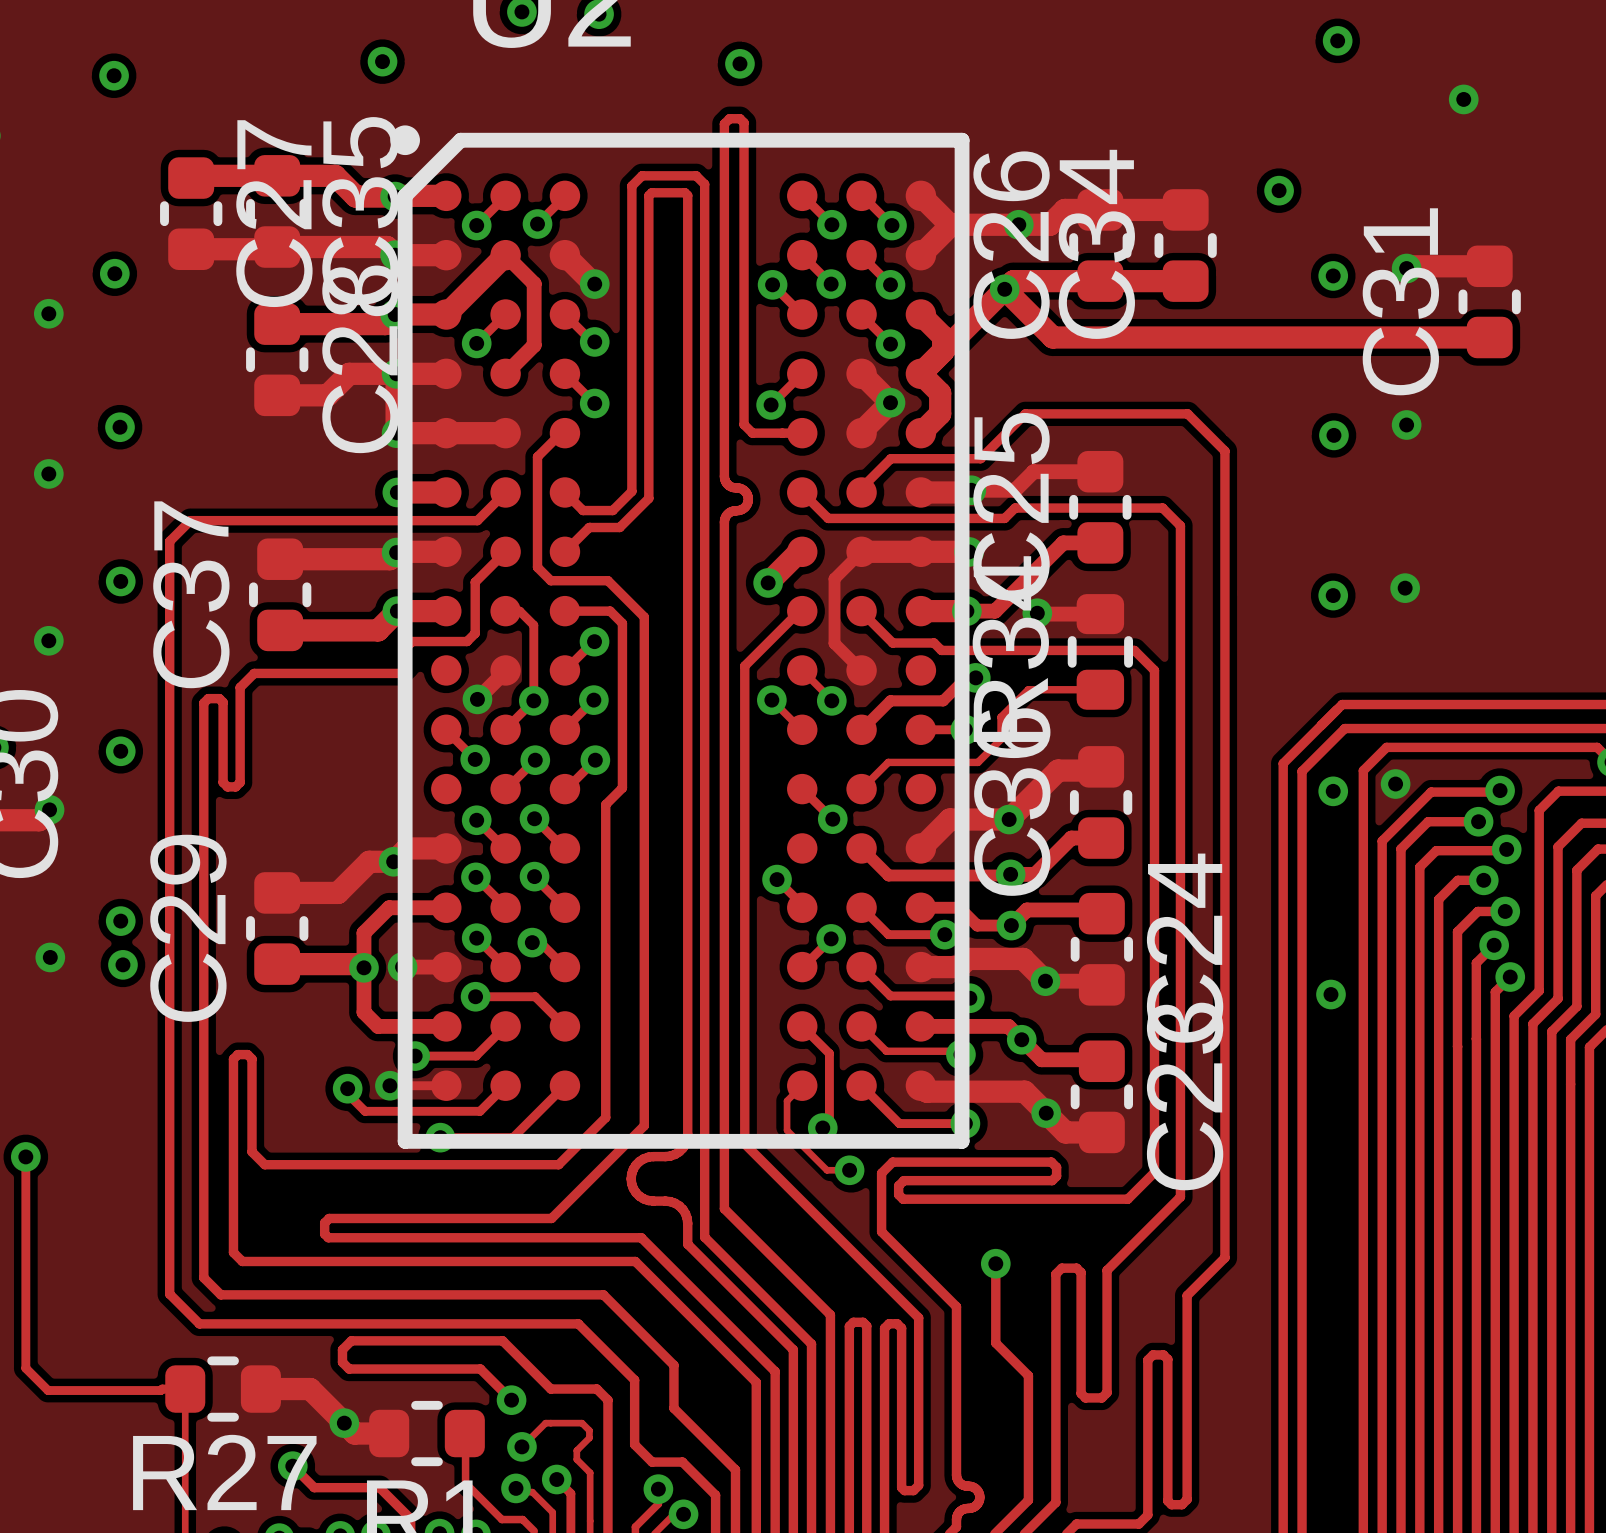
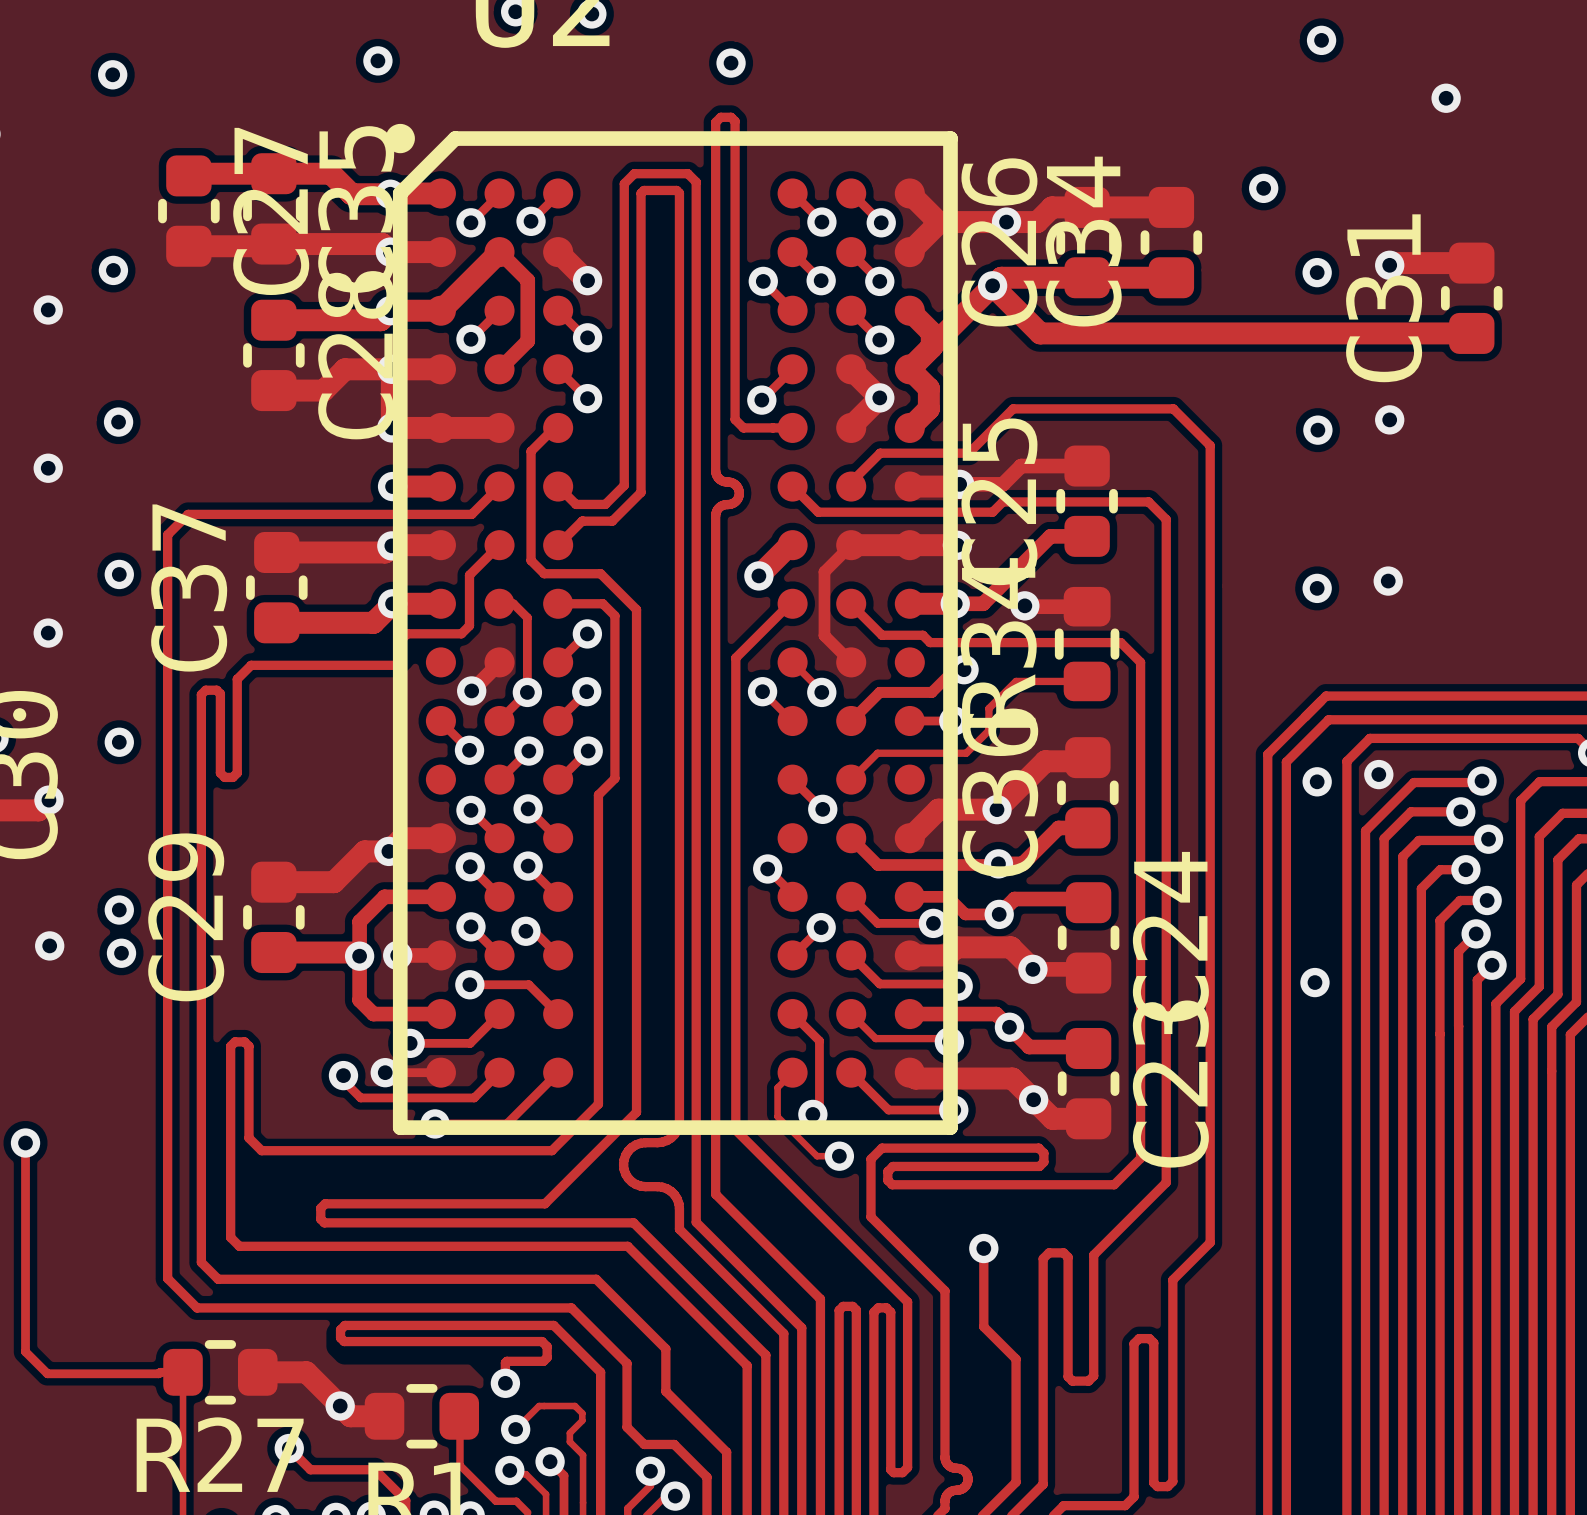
track: (511, 1400) (480, 1369) (349, 1369) (342, 1362) (342, 1349) (351, 1340) (502, 1340) (550, 1389) (596, 1389) (607, 1400) -> (505, 1383) (506, 1361) (543, 1361) (547, 1357) (547, 1346) (542, 1341) (344, 1341) (340, 1337) (340, 1329) (344, 1325) (553, 1325) (600, 1372) (600, 1383)

